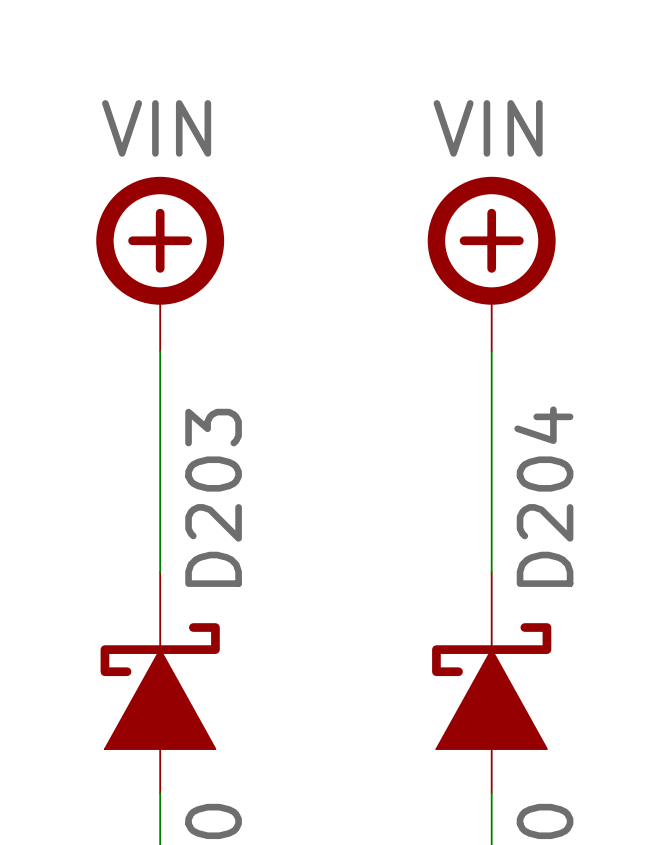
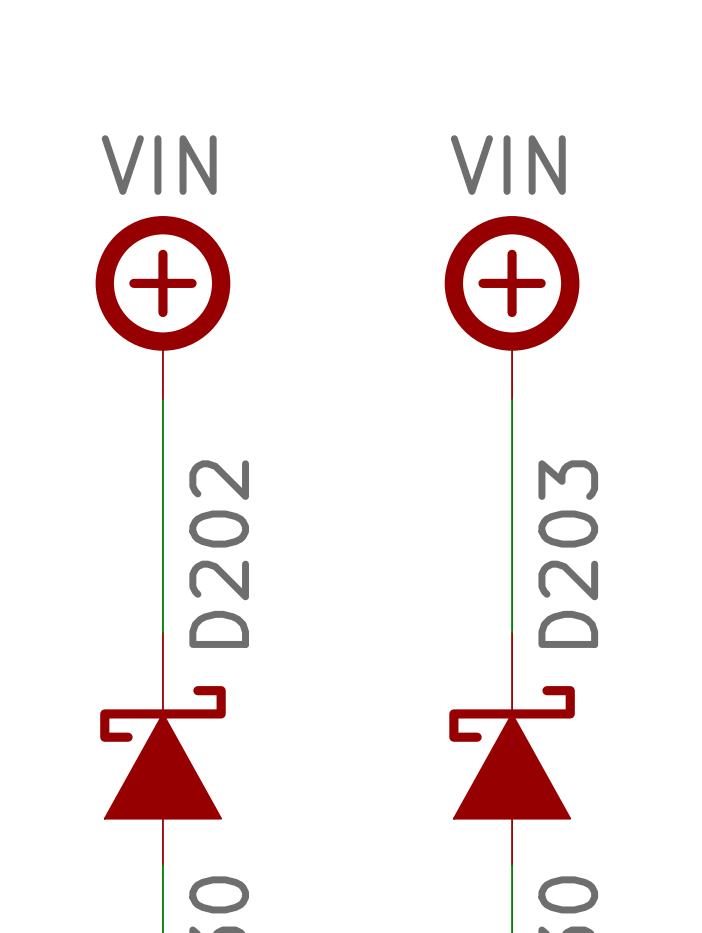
D204 name: D204 (543, 496) -> D203 (568, 554)
D203 name: D203 (213, 497) -> D202 (219, 554)

